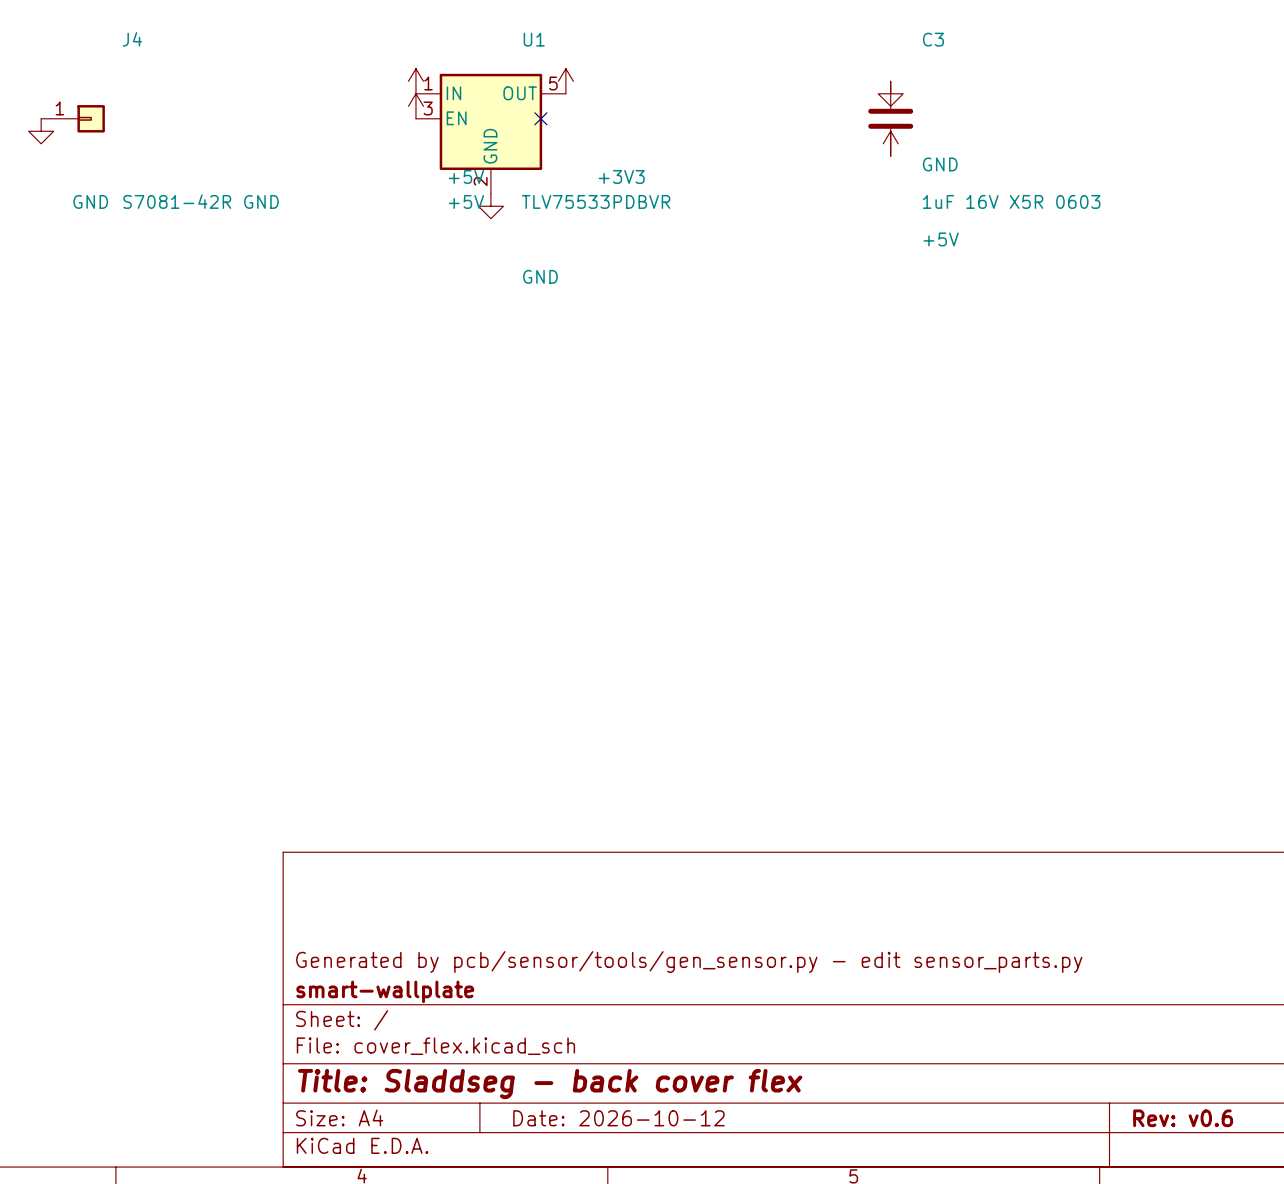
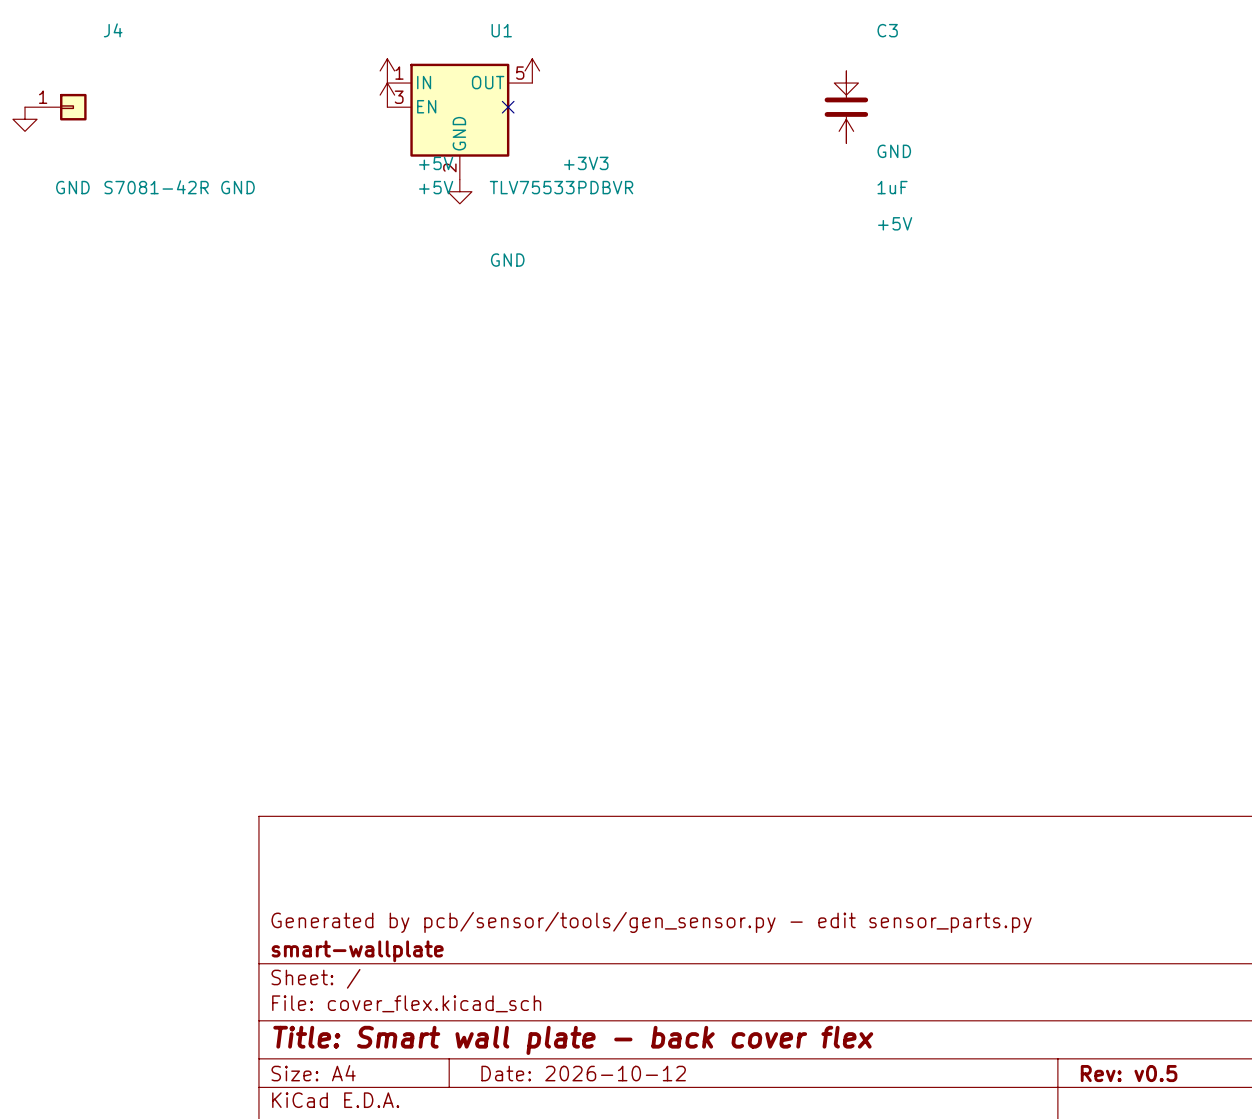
C3 value: 1uF 16V X5R 0603 (1011, 201) -> 1uF (892, 187)
title block: Title: Sladdseg - back cover flex (550, 1084) -> Title: Smart wall plate - back cover flex (573, 1040)
title block: Rev: v0.6 (1183, 1118) -> Rev: v0.5 (1129, 1073)

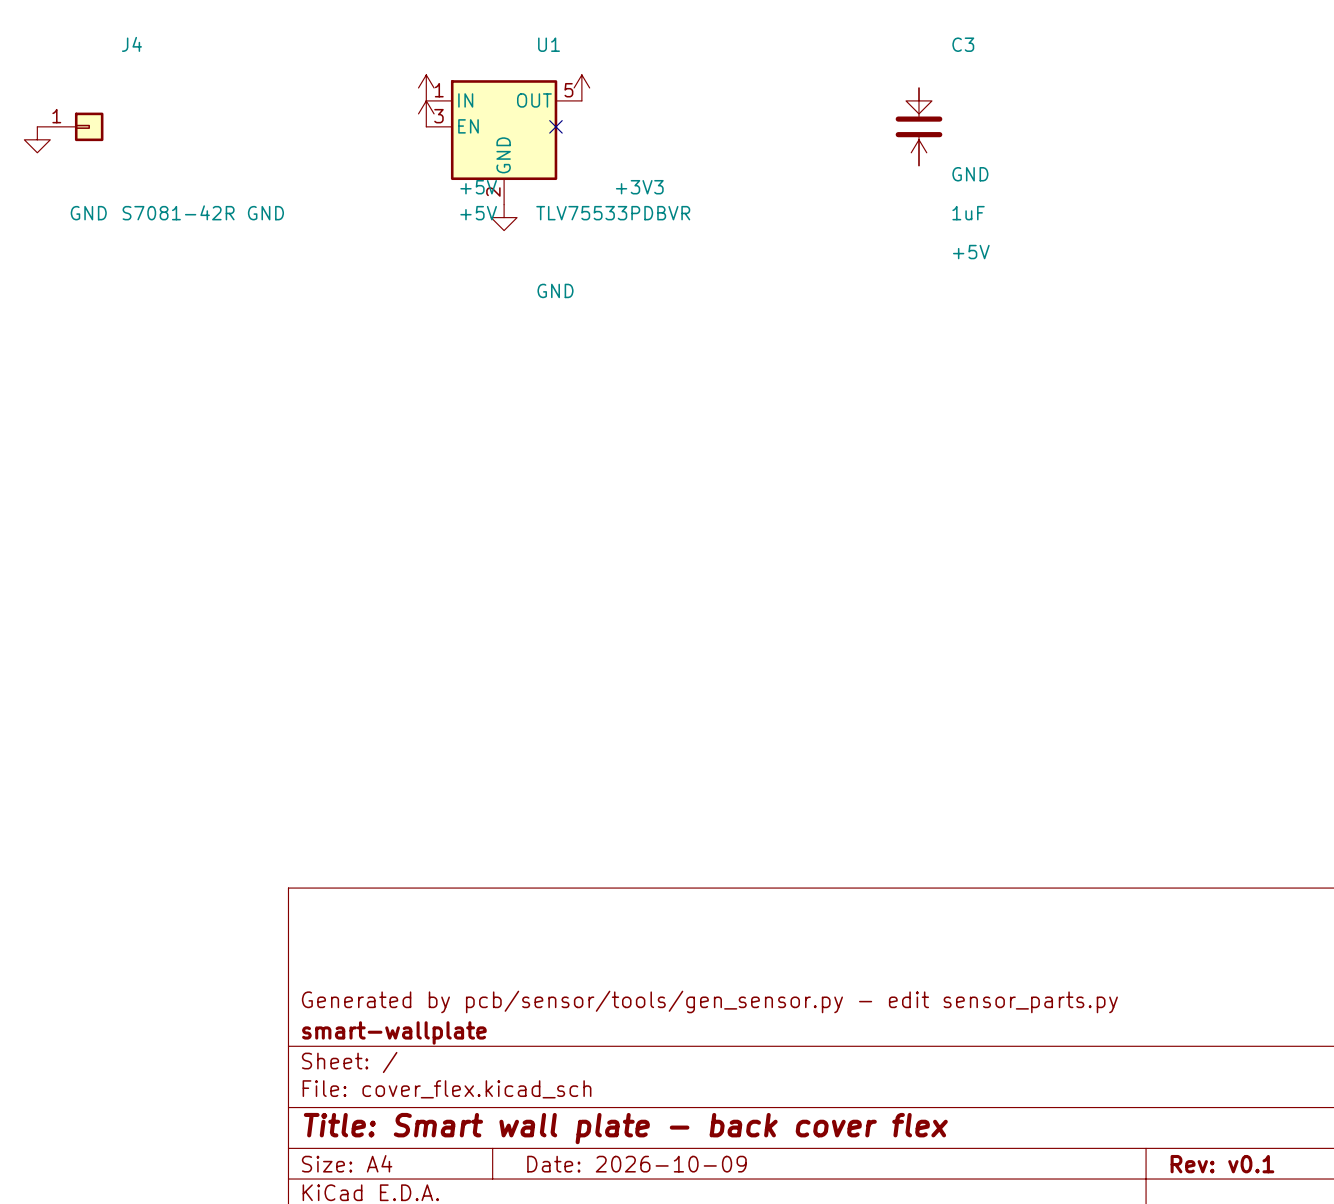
title block: Date: 2026-10-12 (583, 1073) -> Date: 2026-10-09 (636, 1164)
title block: Rev: v0.5 (1129, 1073) -> Rev: v0.1 (1222, 1164)

